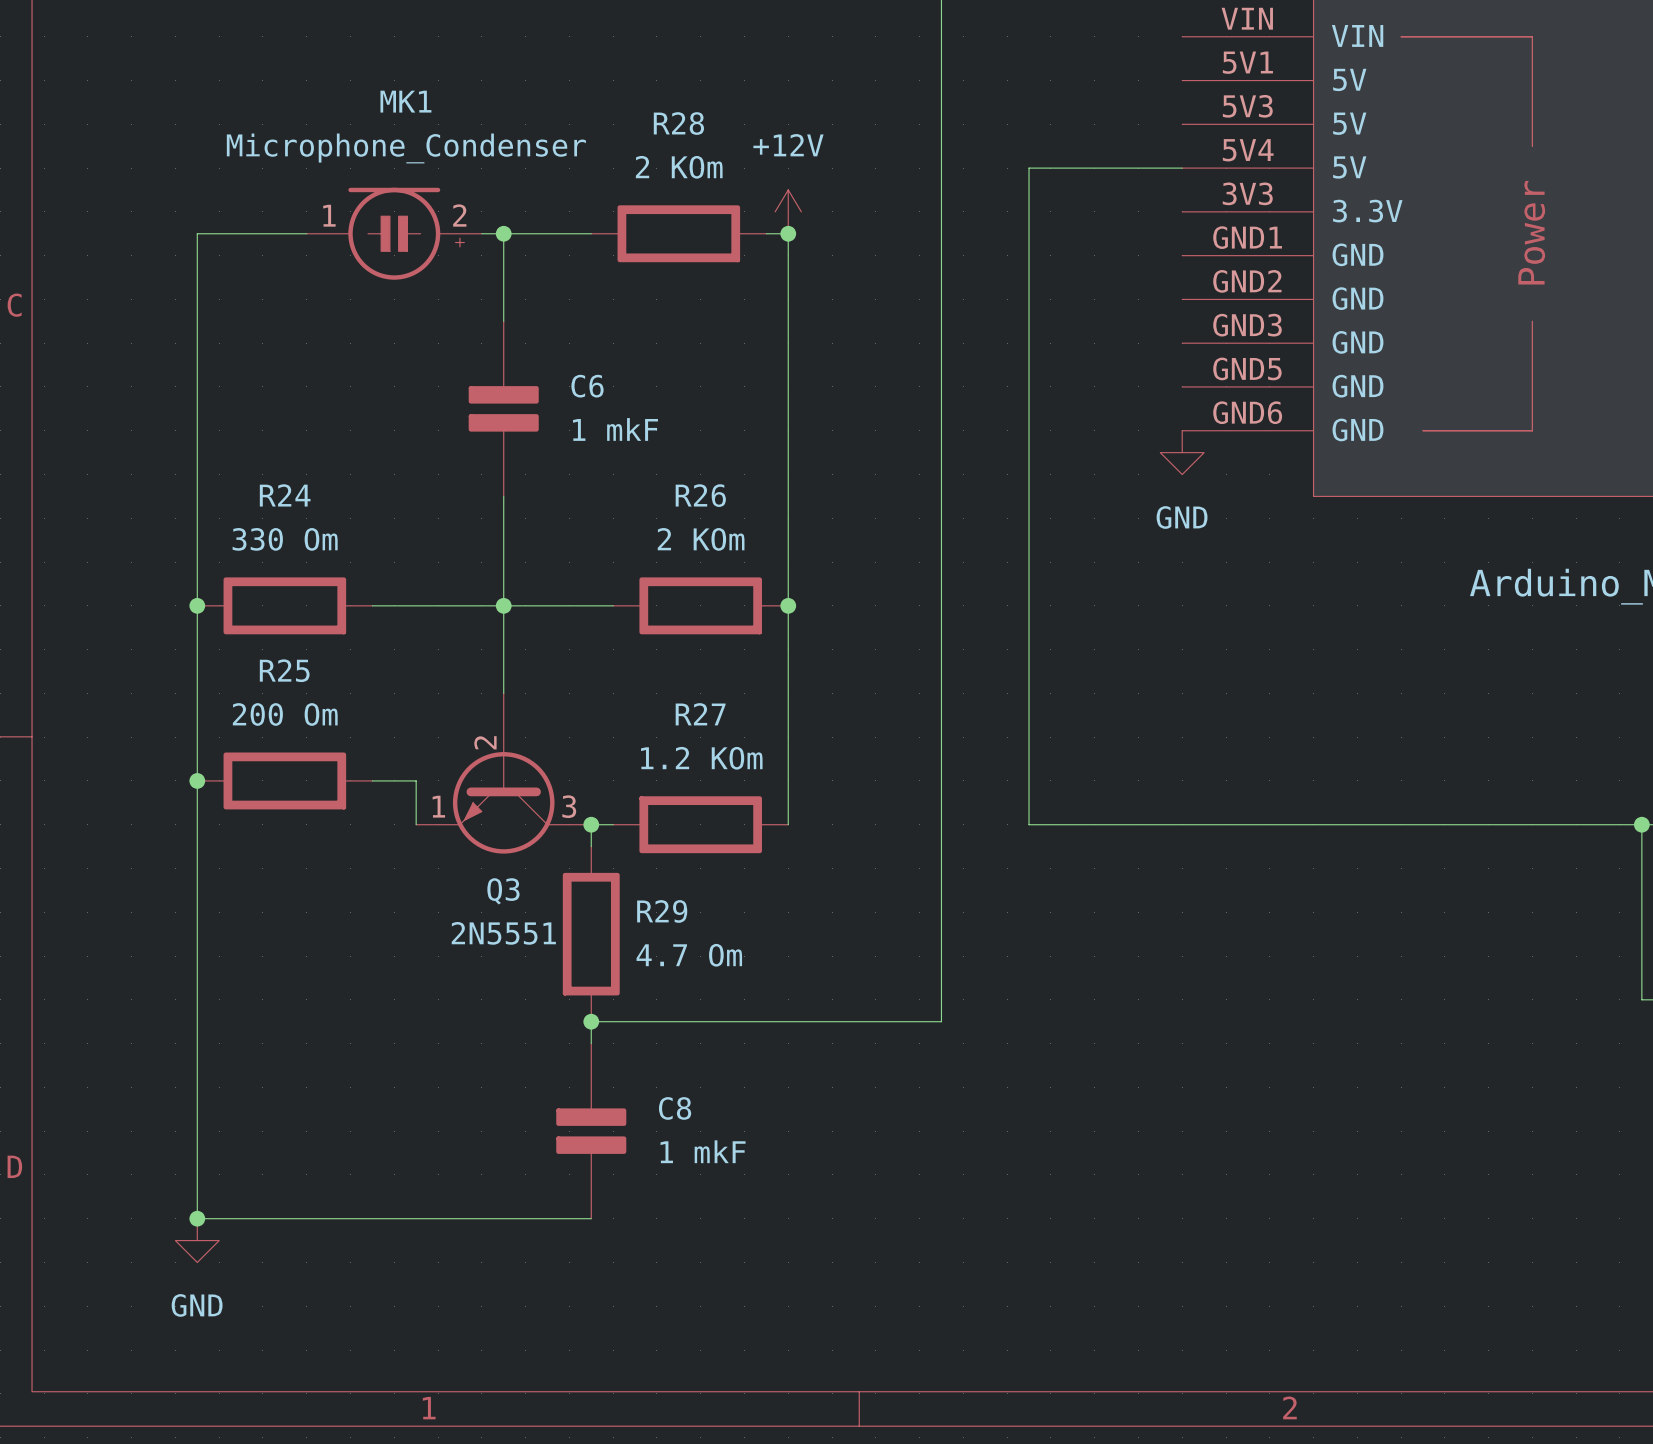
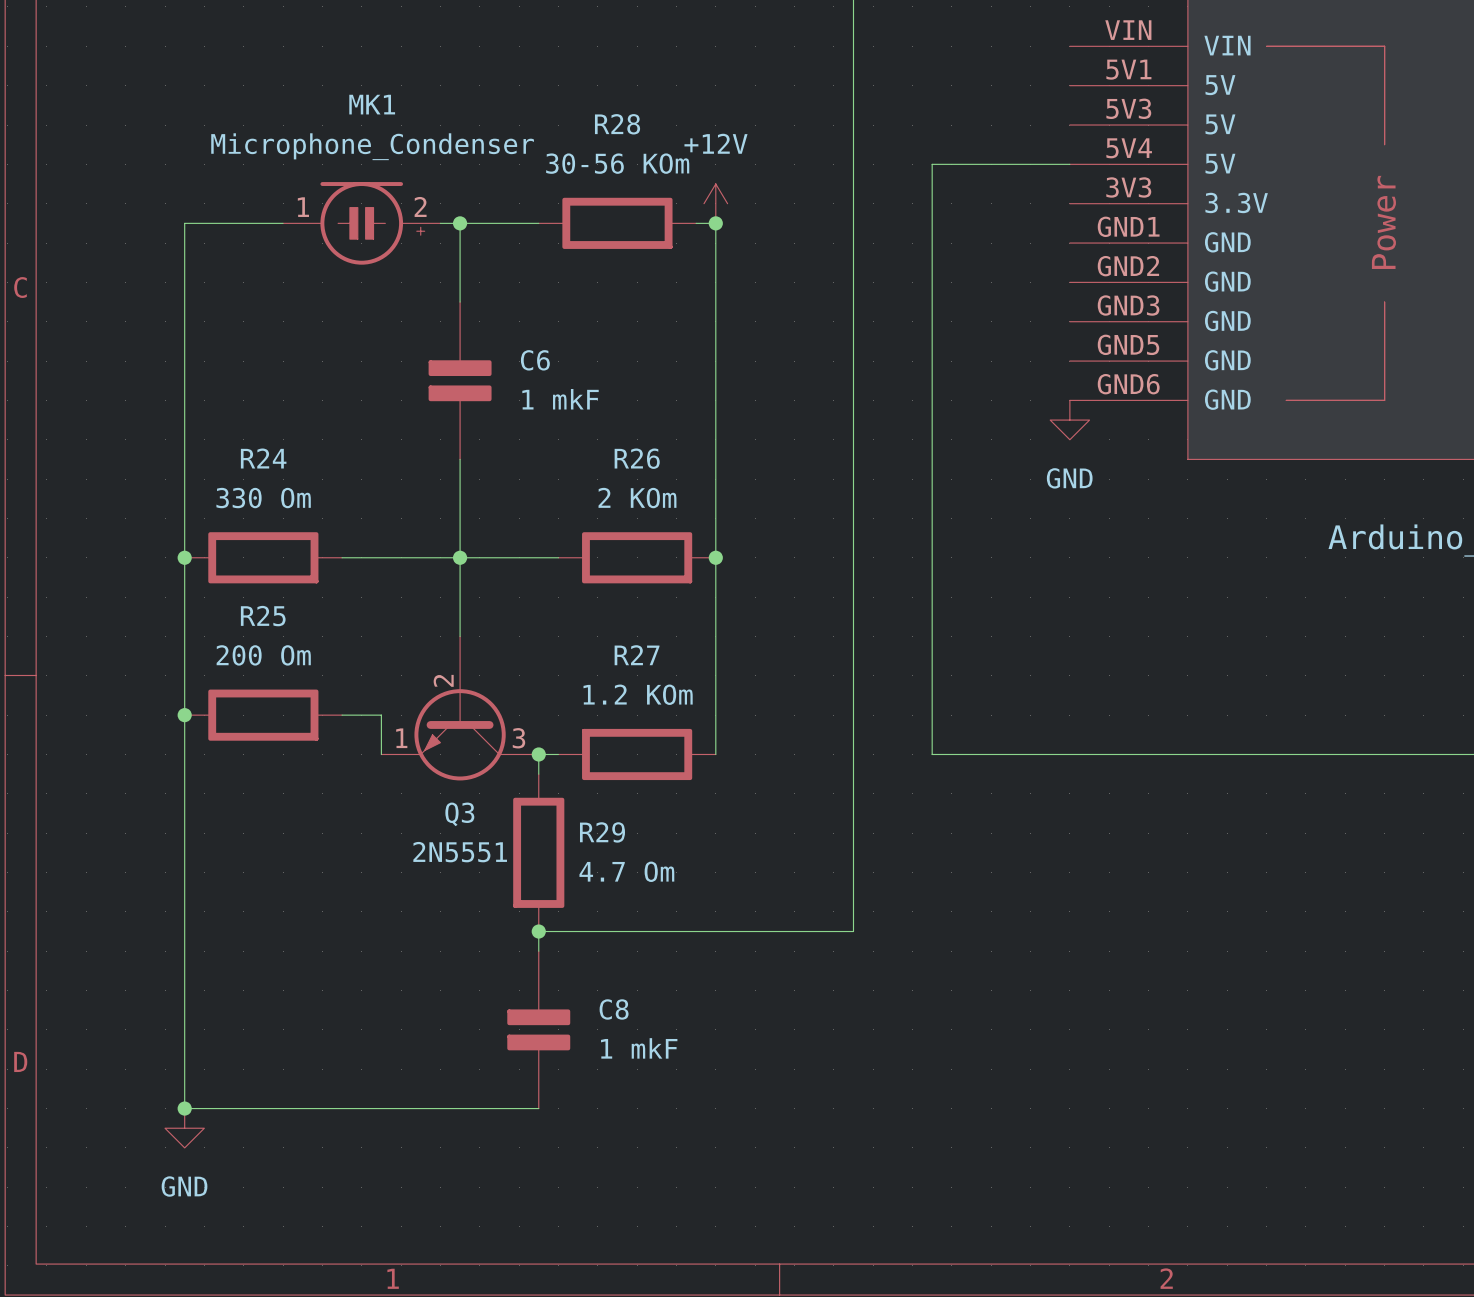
R28 value: 2 KOm (679, 167) -> 30-56 KOm (617, 163)

